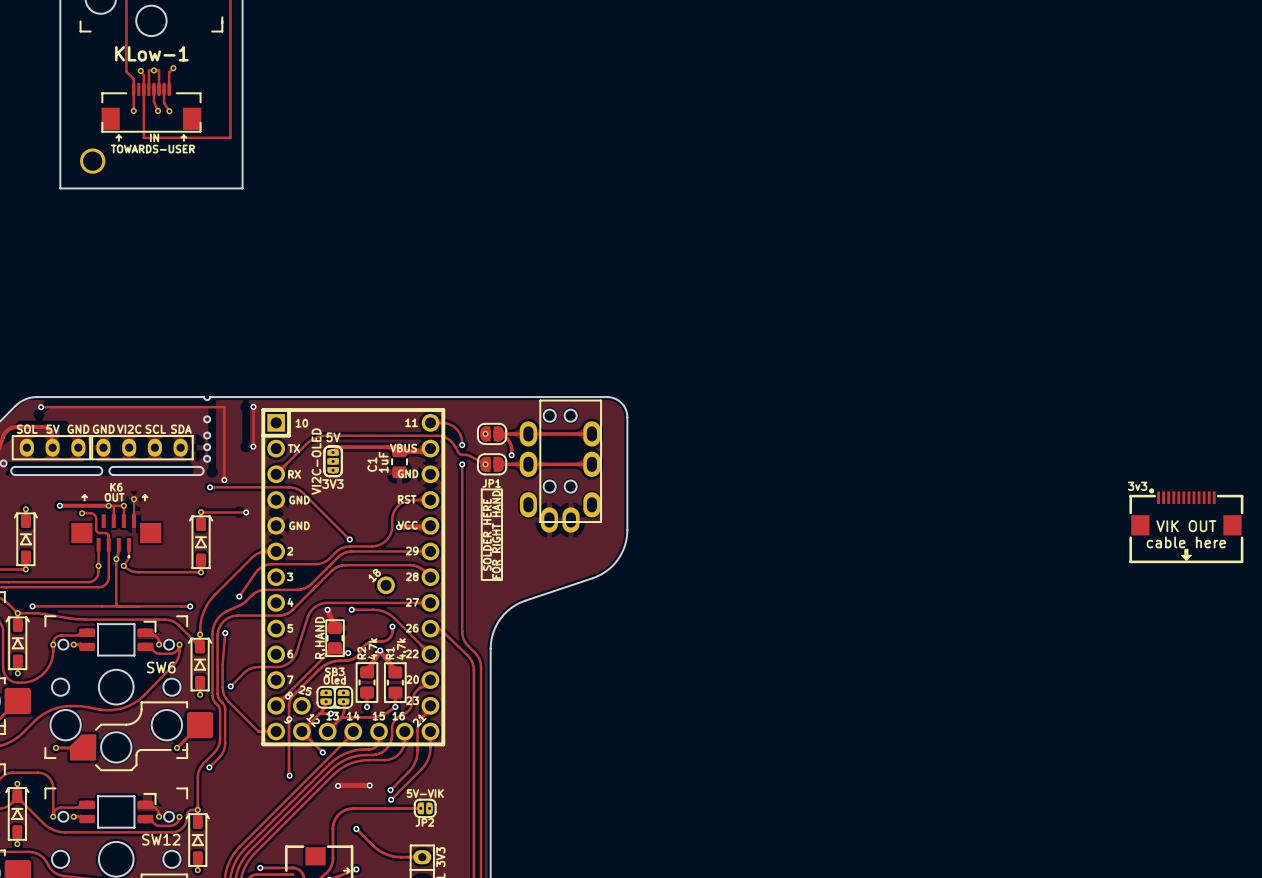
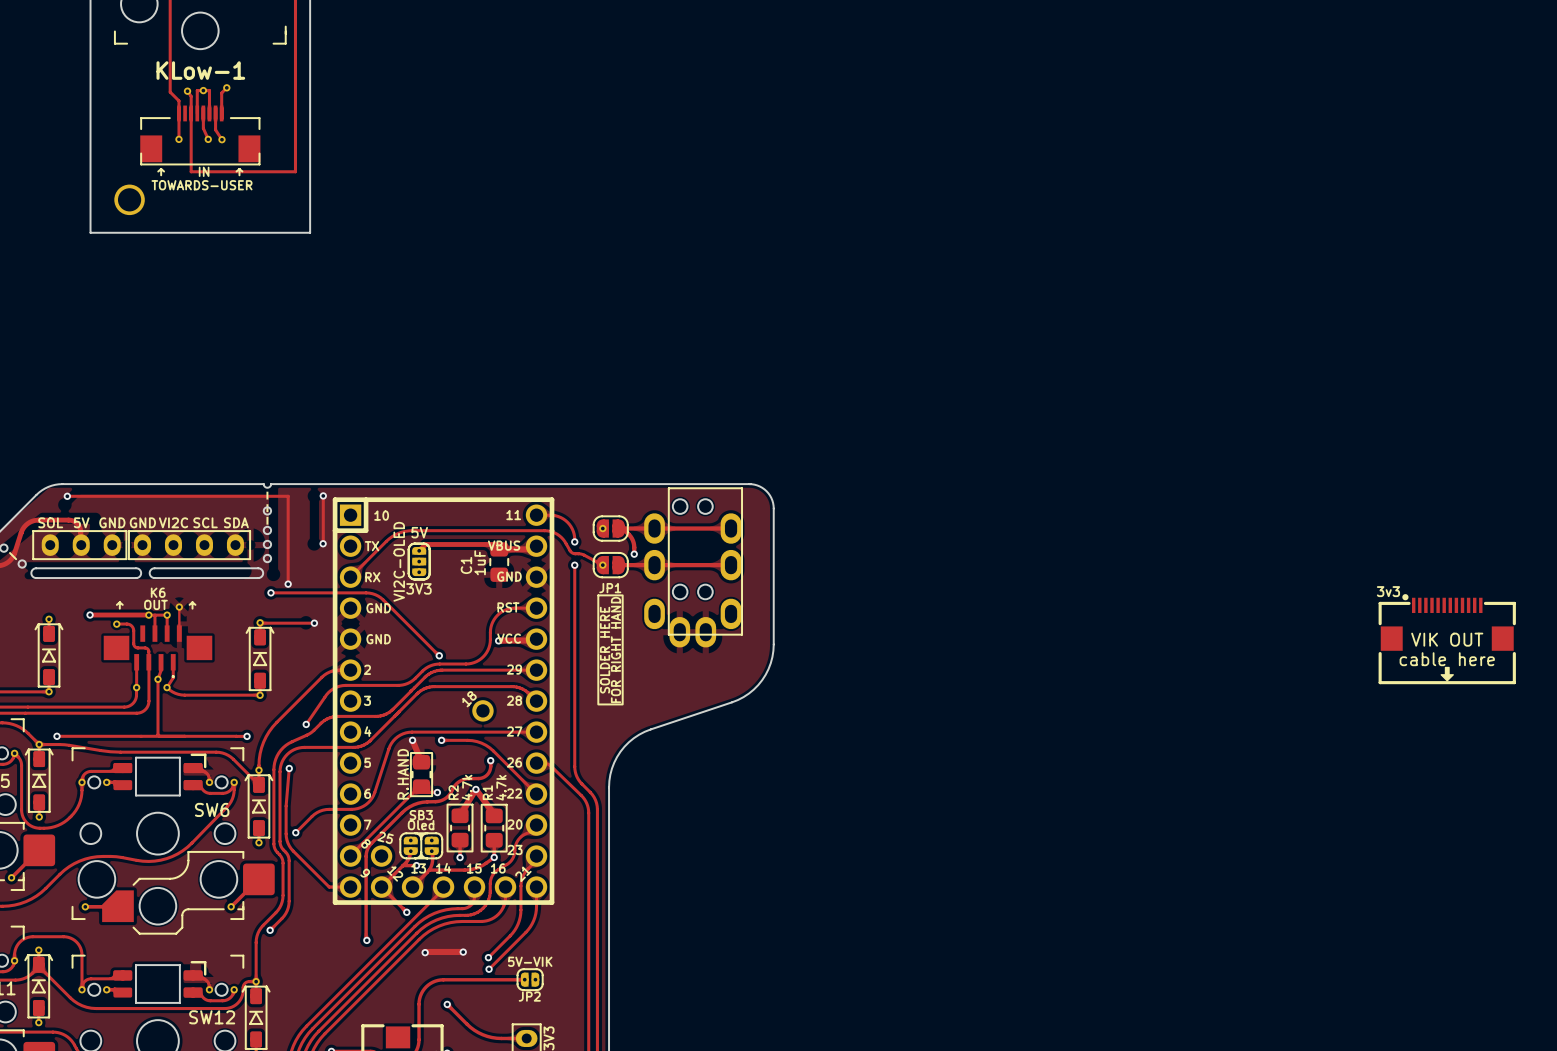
line: none -> (267, 489) (267, 524)

